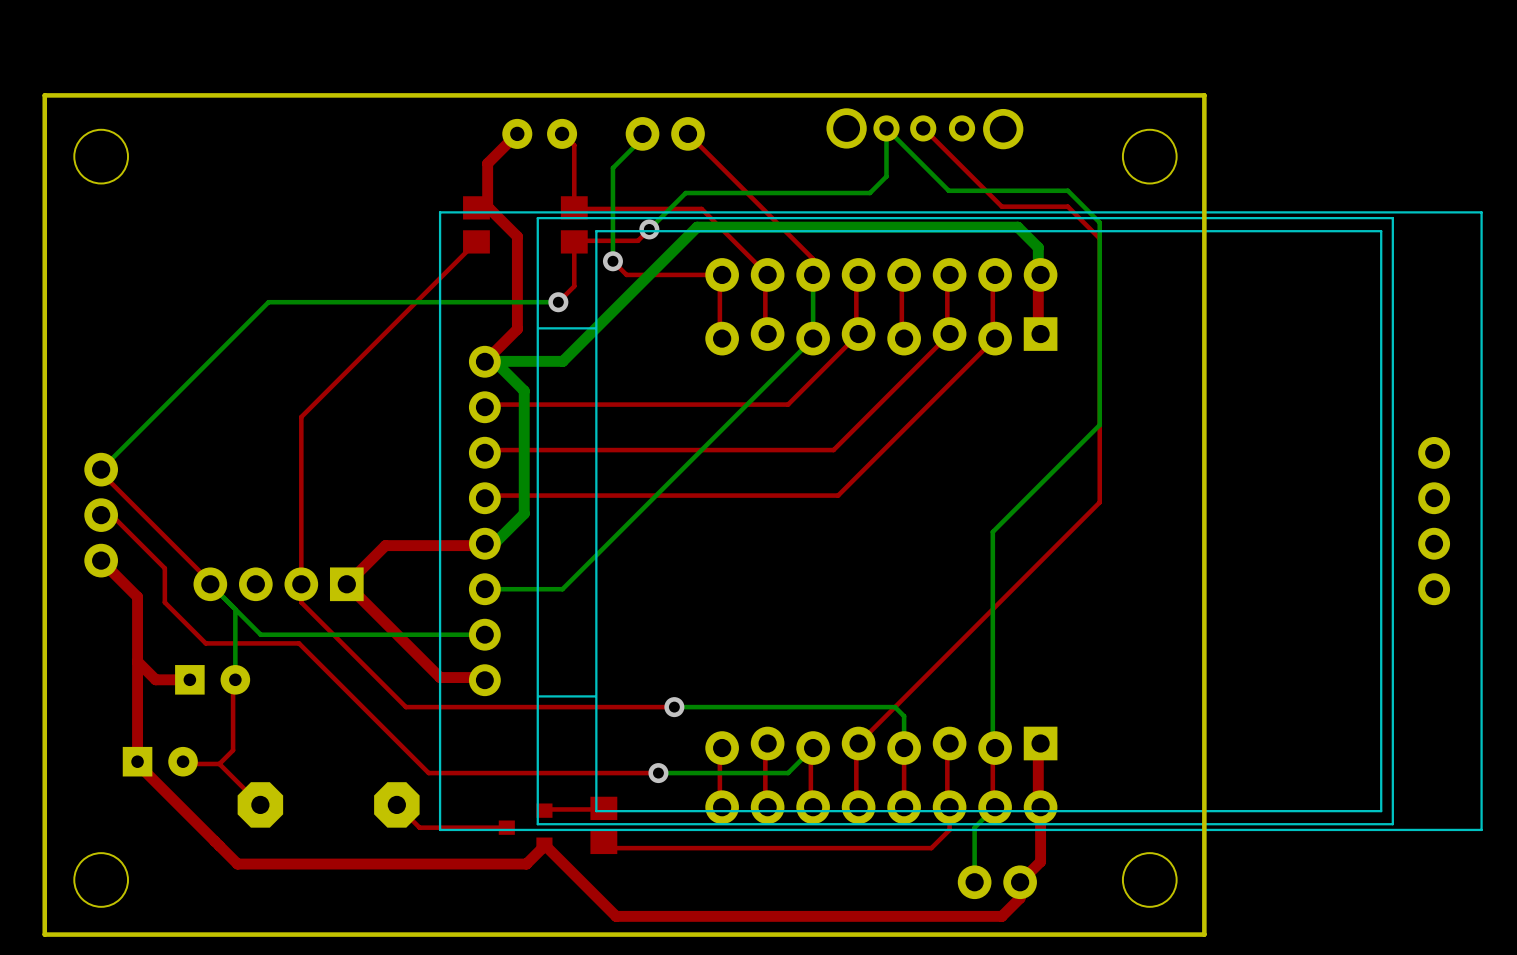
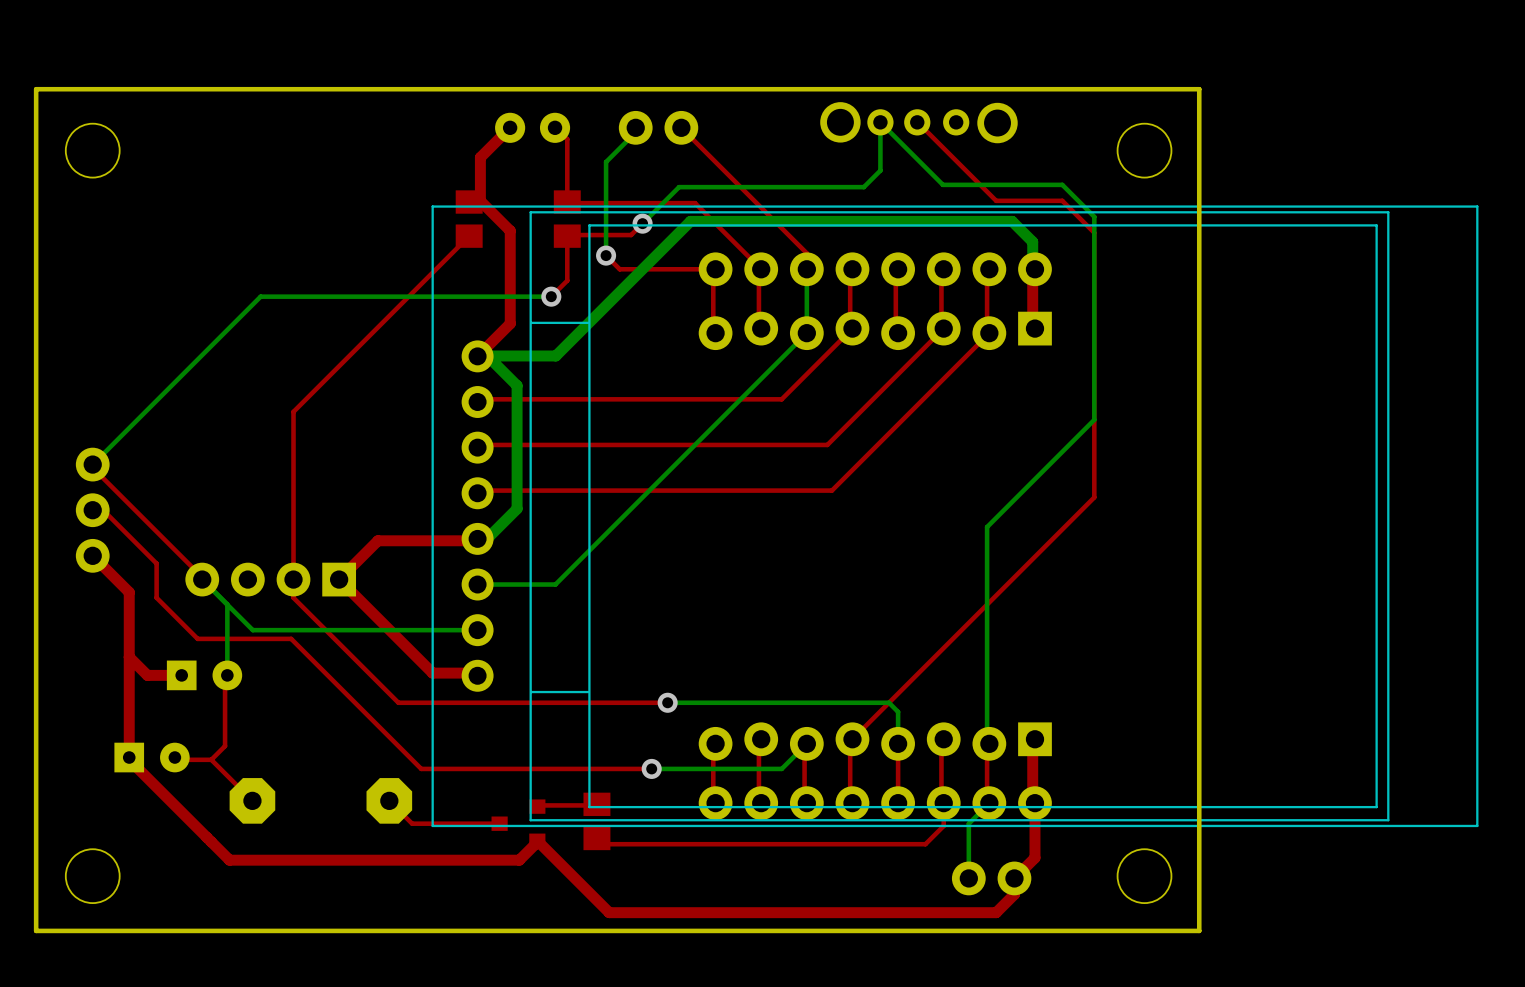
part footprint: [438, 211, 1483, 832] -> [431, 205, 1479, 828]

